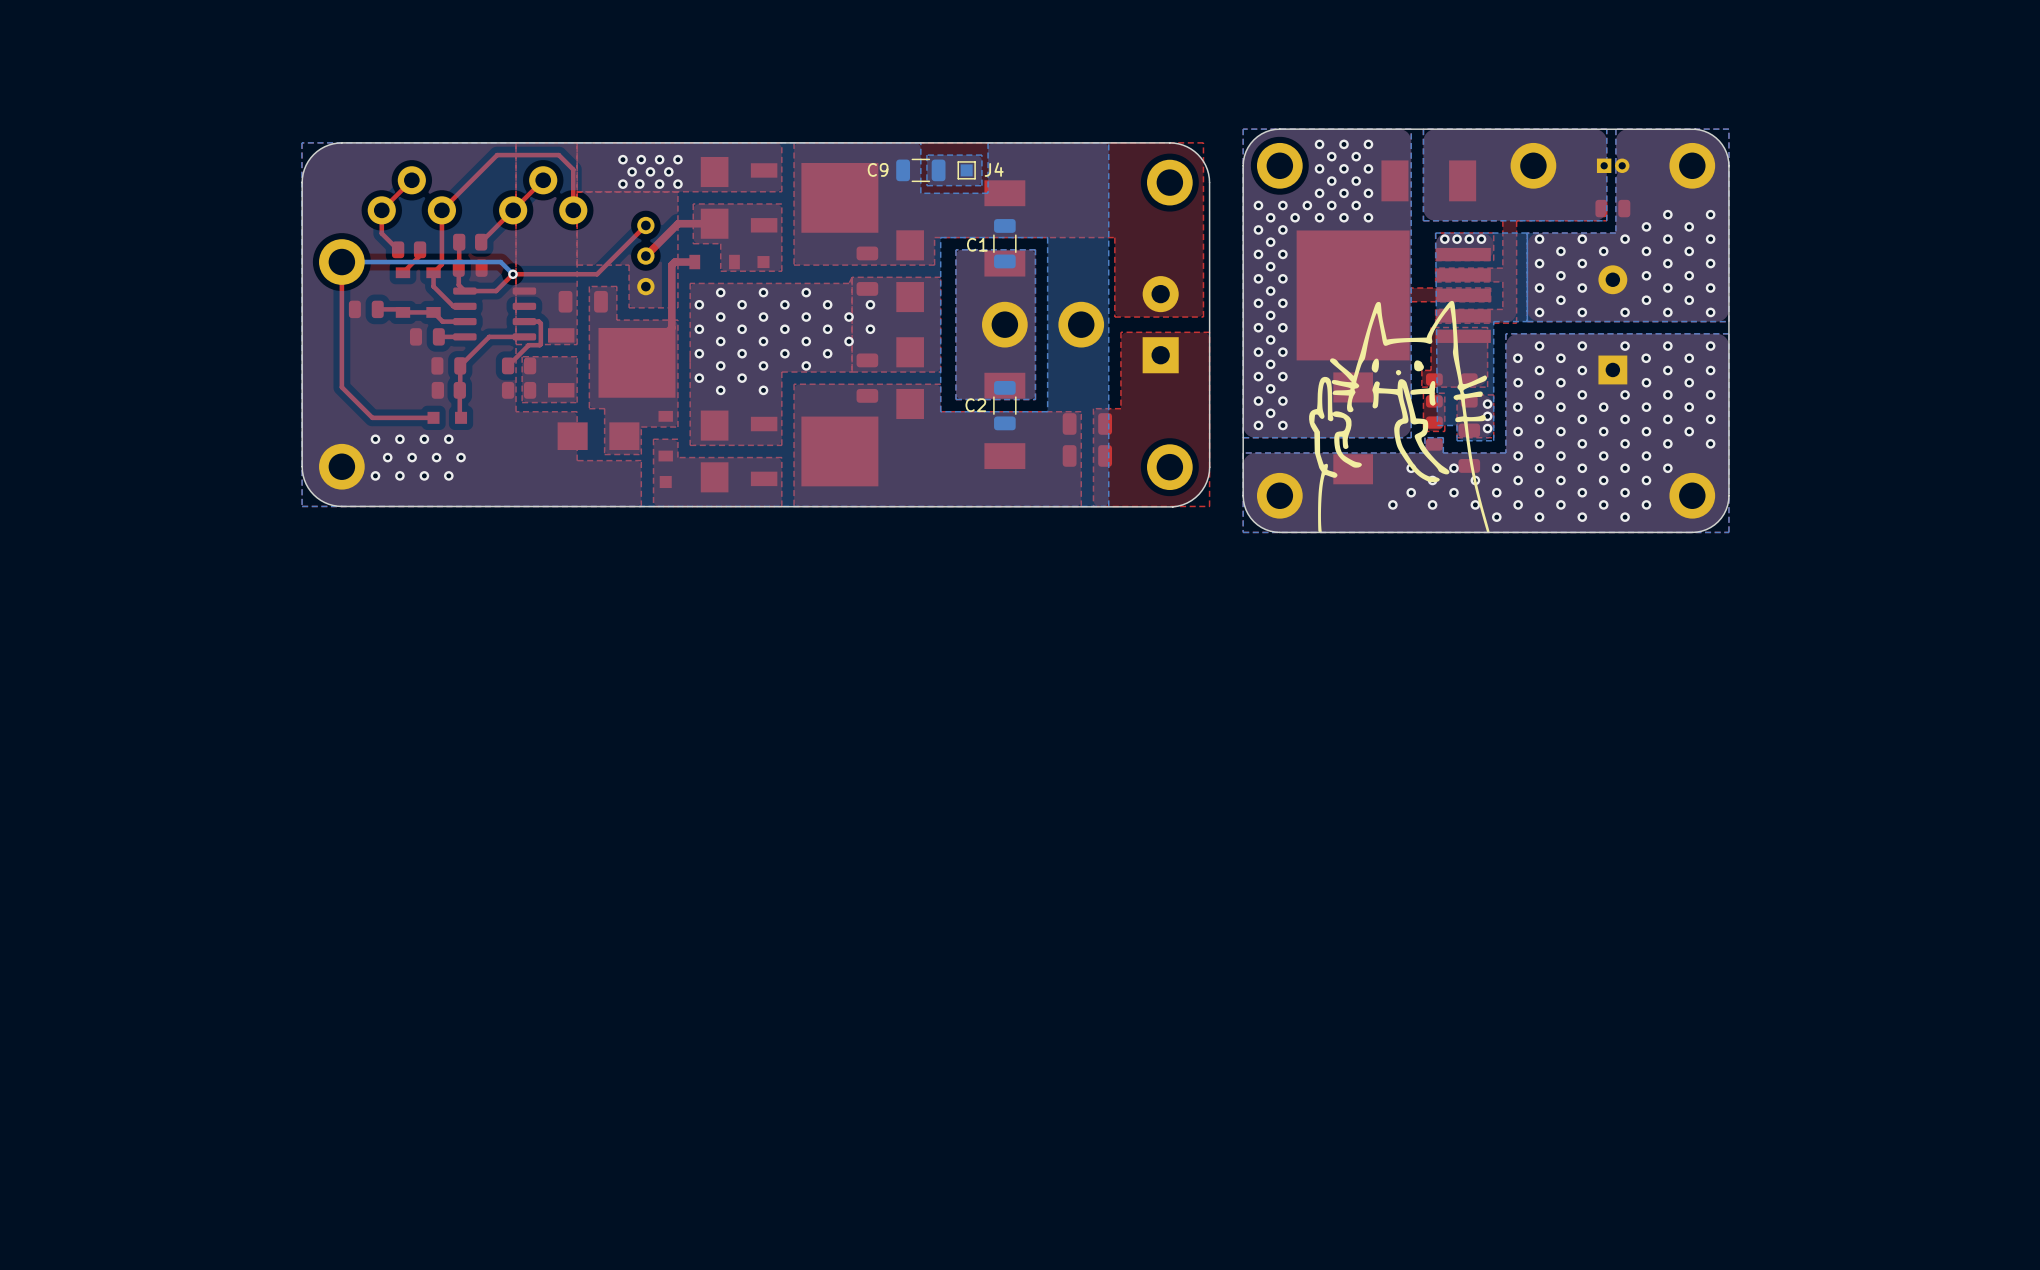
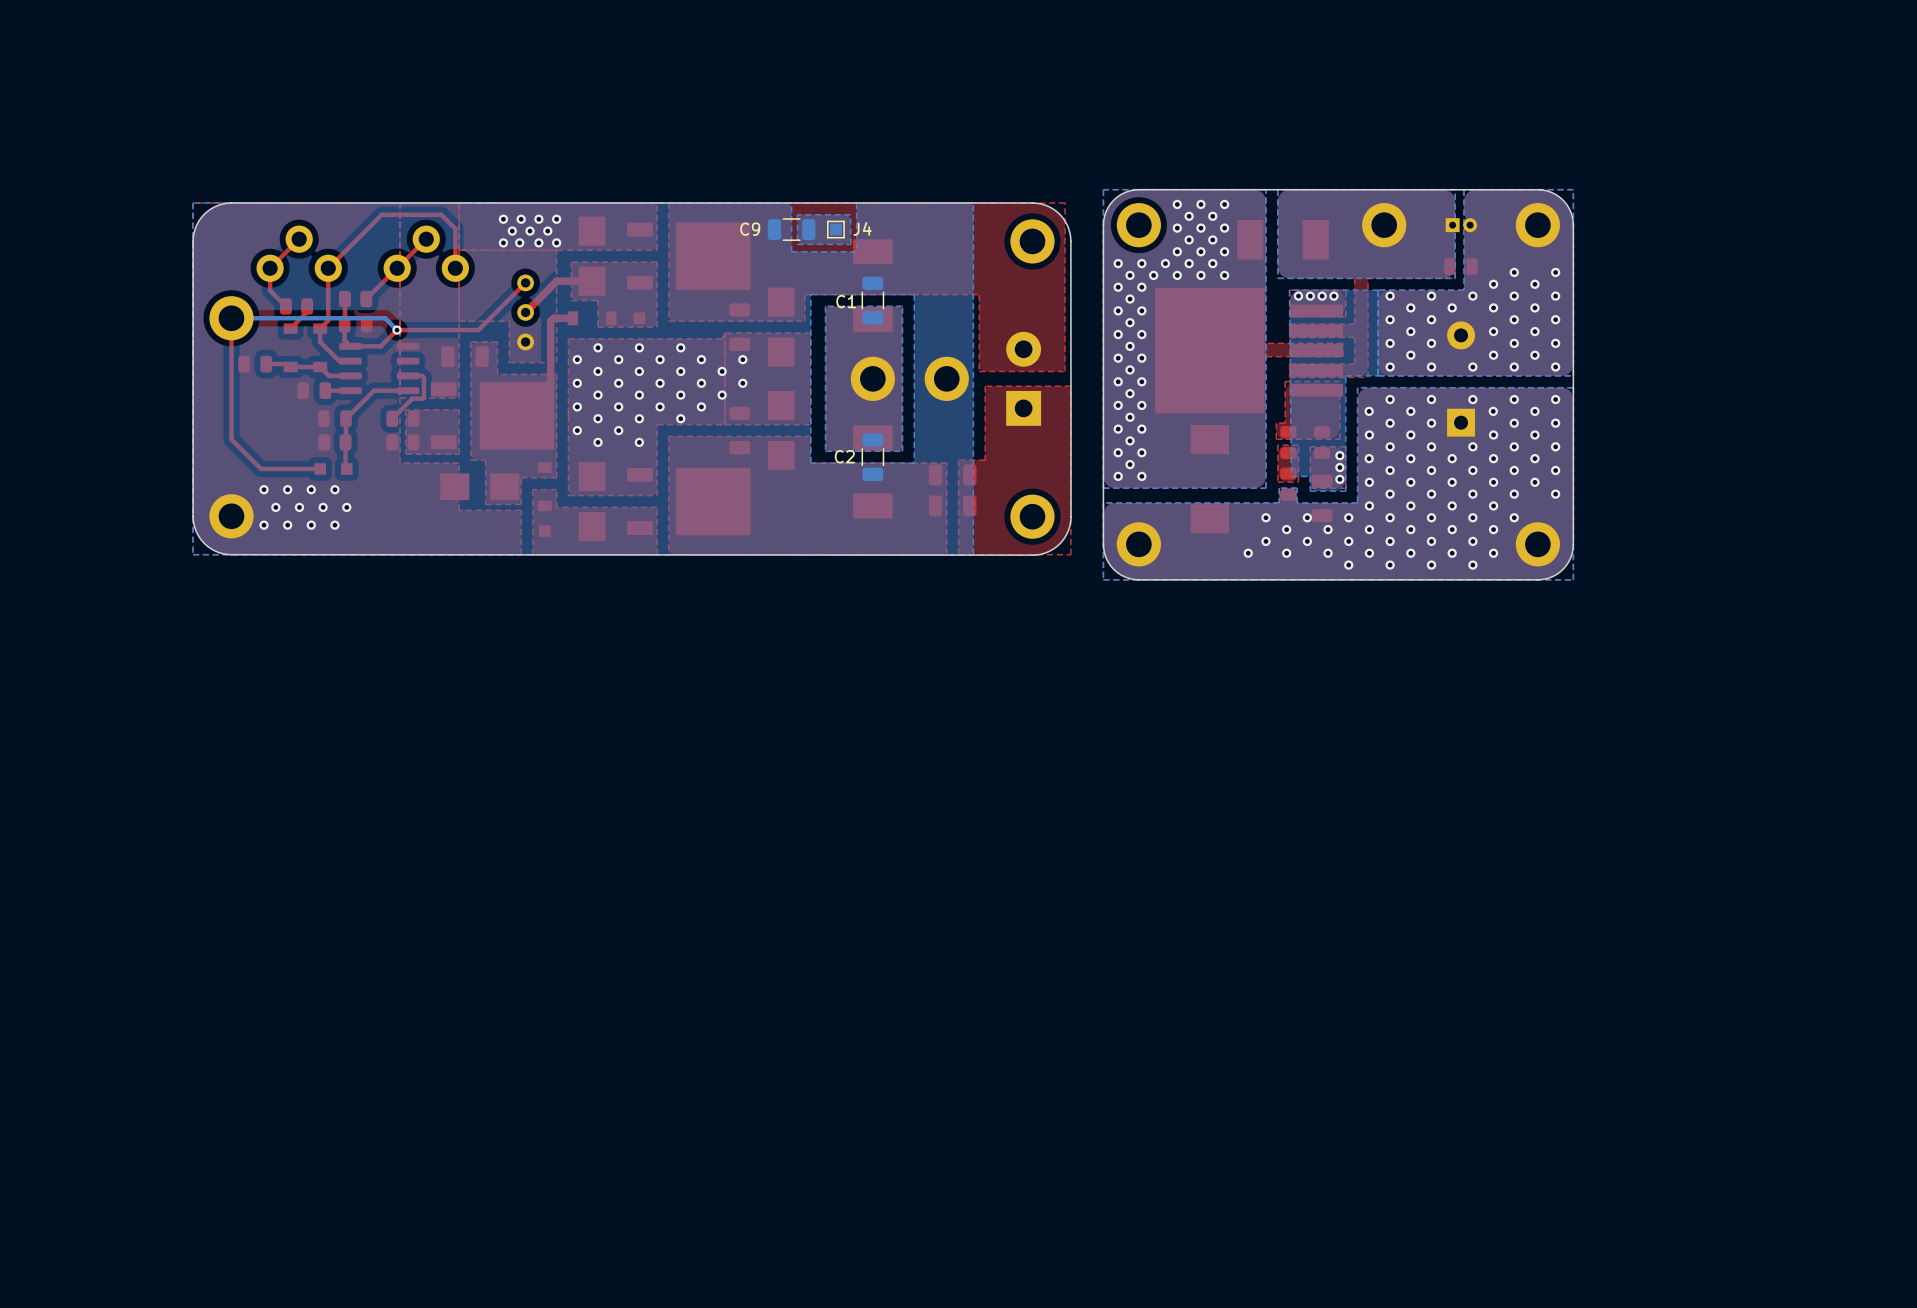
drawing: [1309, 300, 1490, 533] -> none

